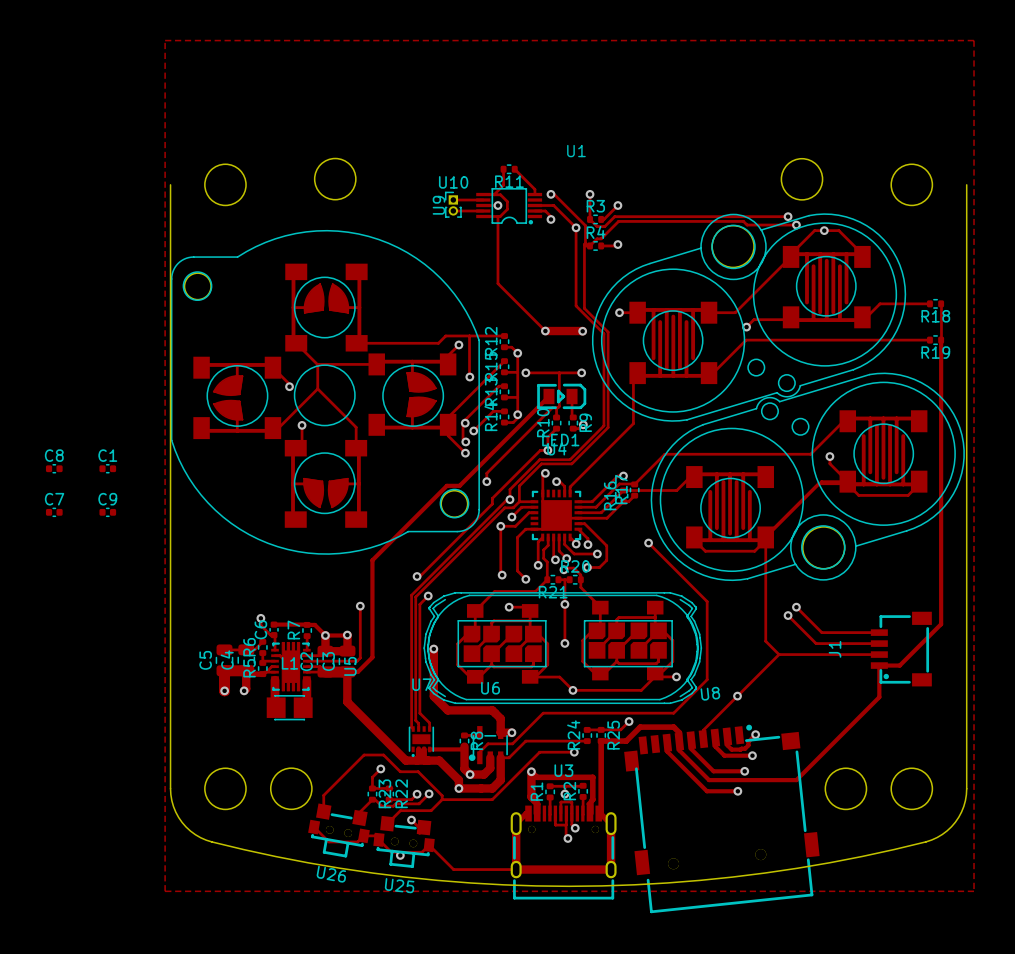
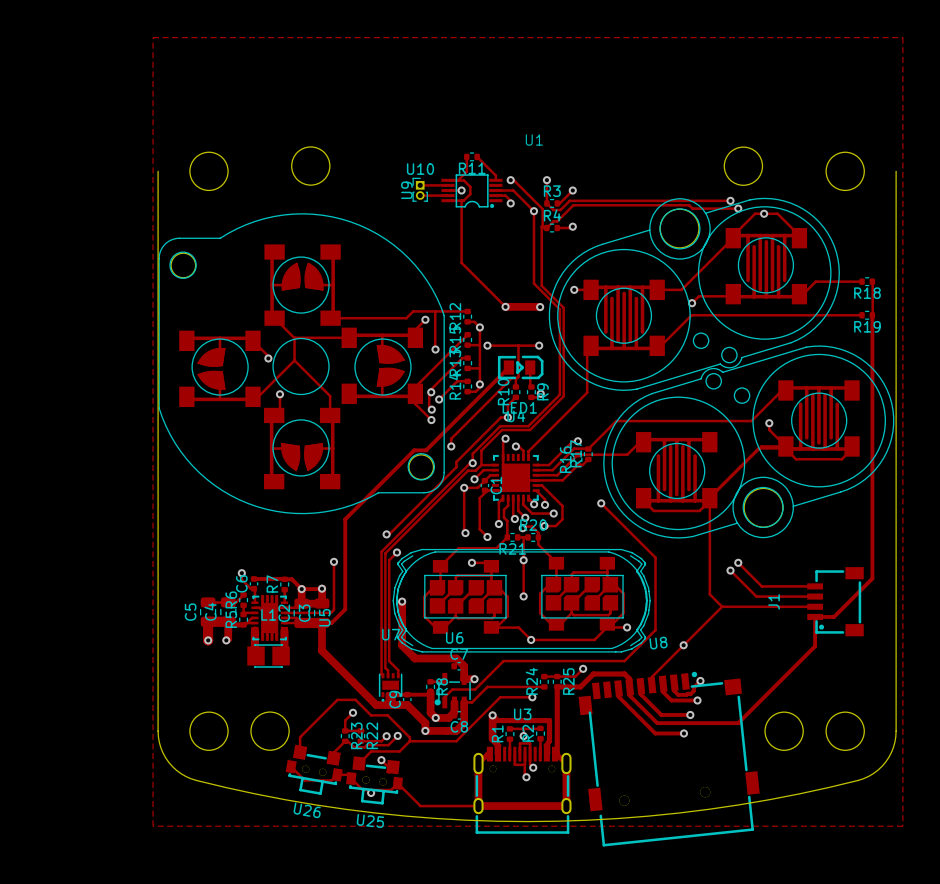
C8 name position: C8 (54, 455) -> C8 (459, 726)
C8 position: (54, 468) -> (459, 715)
C1 rotation: 0° (107, 468) -> 90° clockwise (484, 485)
C1 position: (107, 468) -> (484, 485)
C7 position: (54, 512) -> (459, 666)
C9 rotation: 0° (107, 512) -> 90° clockwise (407, 699)
C9 position: (107, 512) -> (407, 699)

